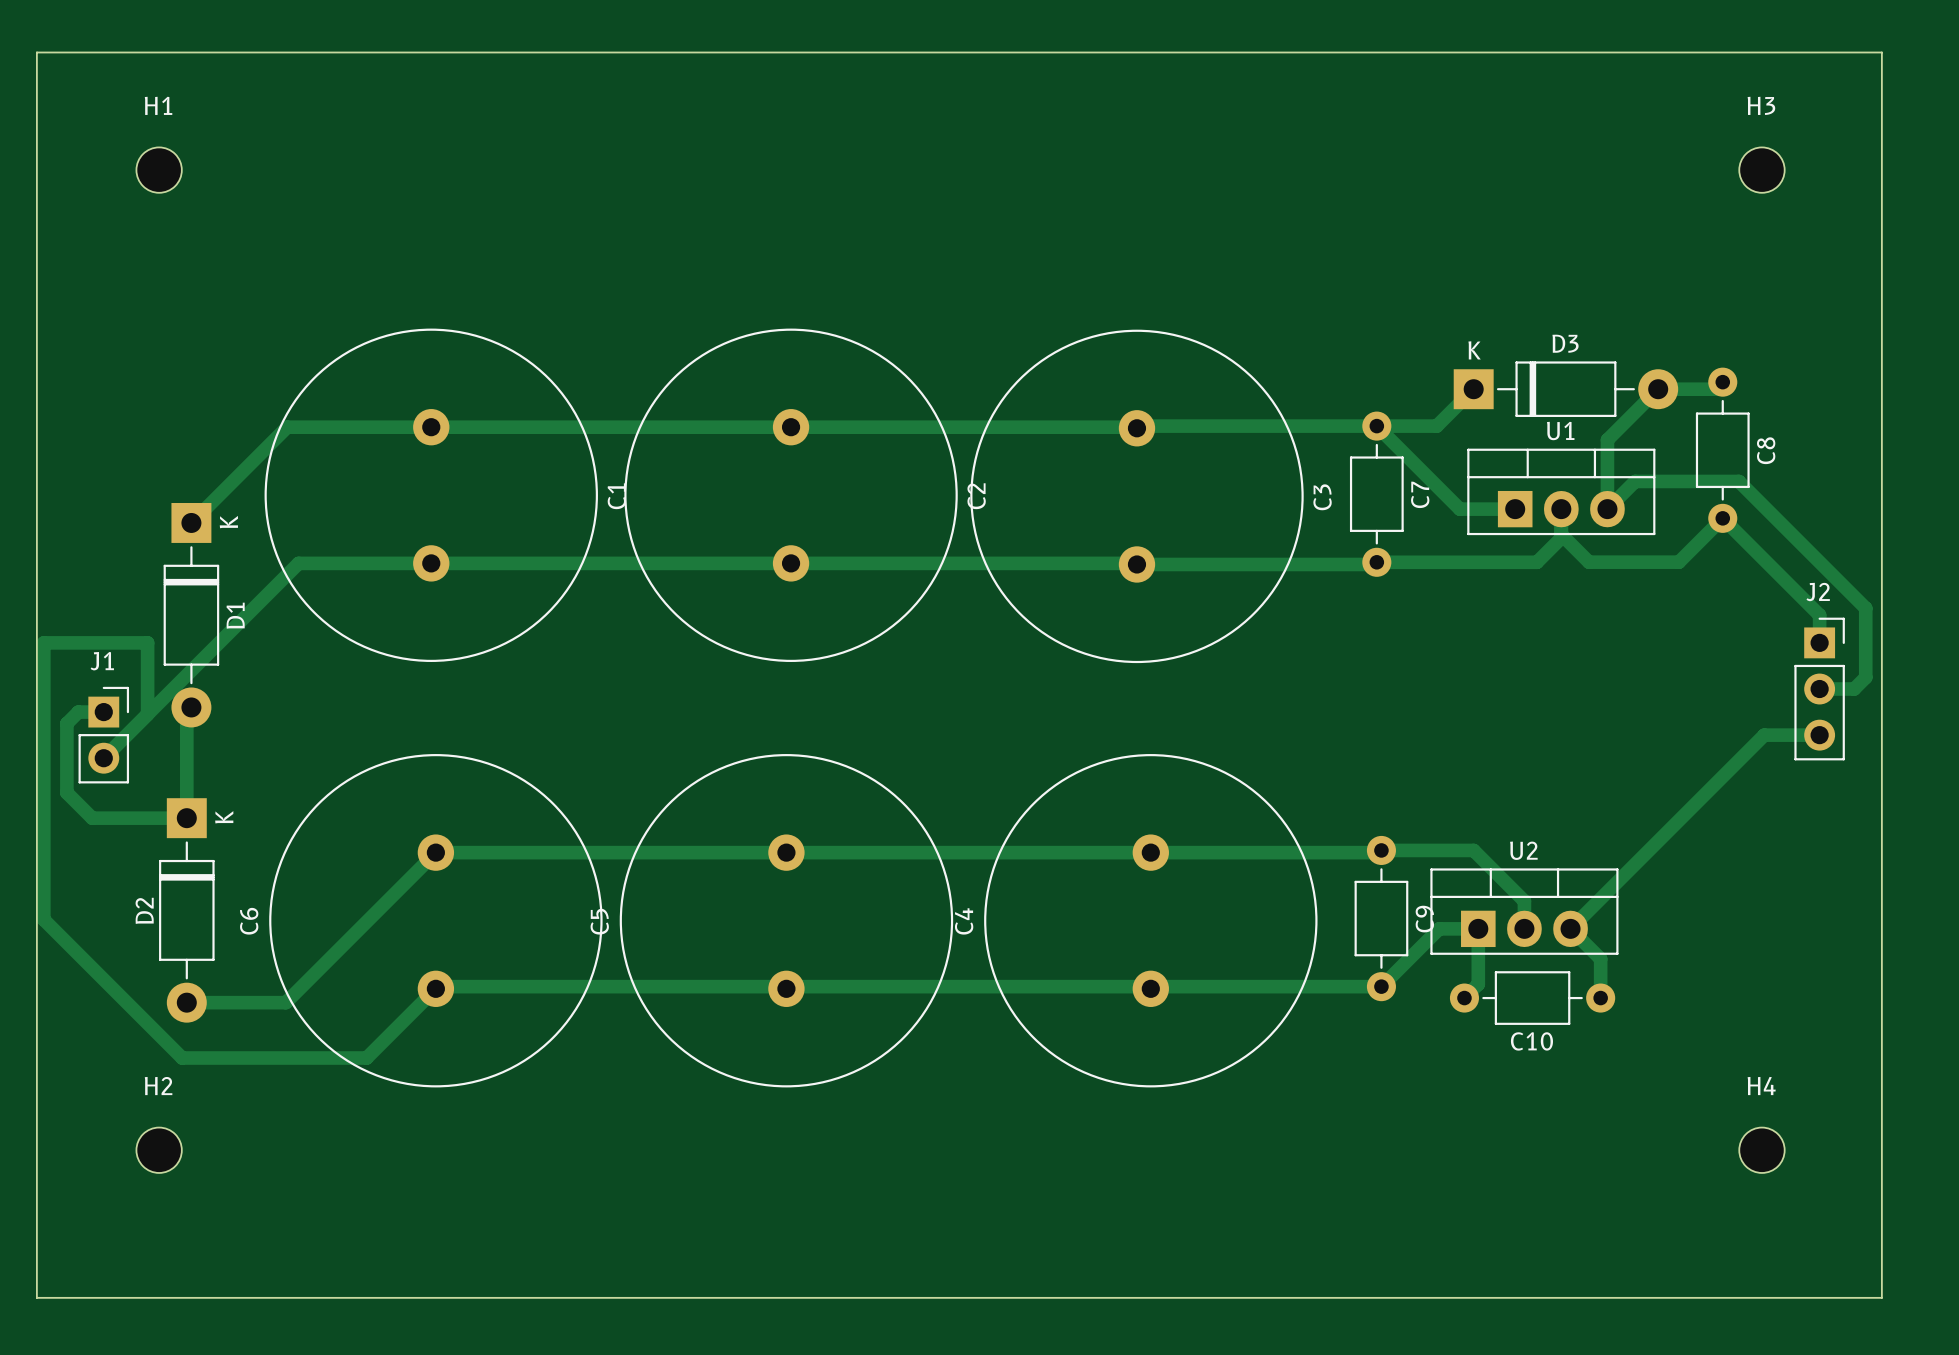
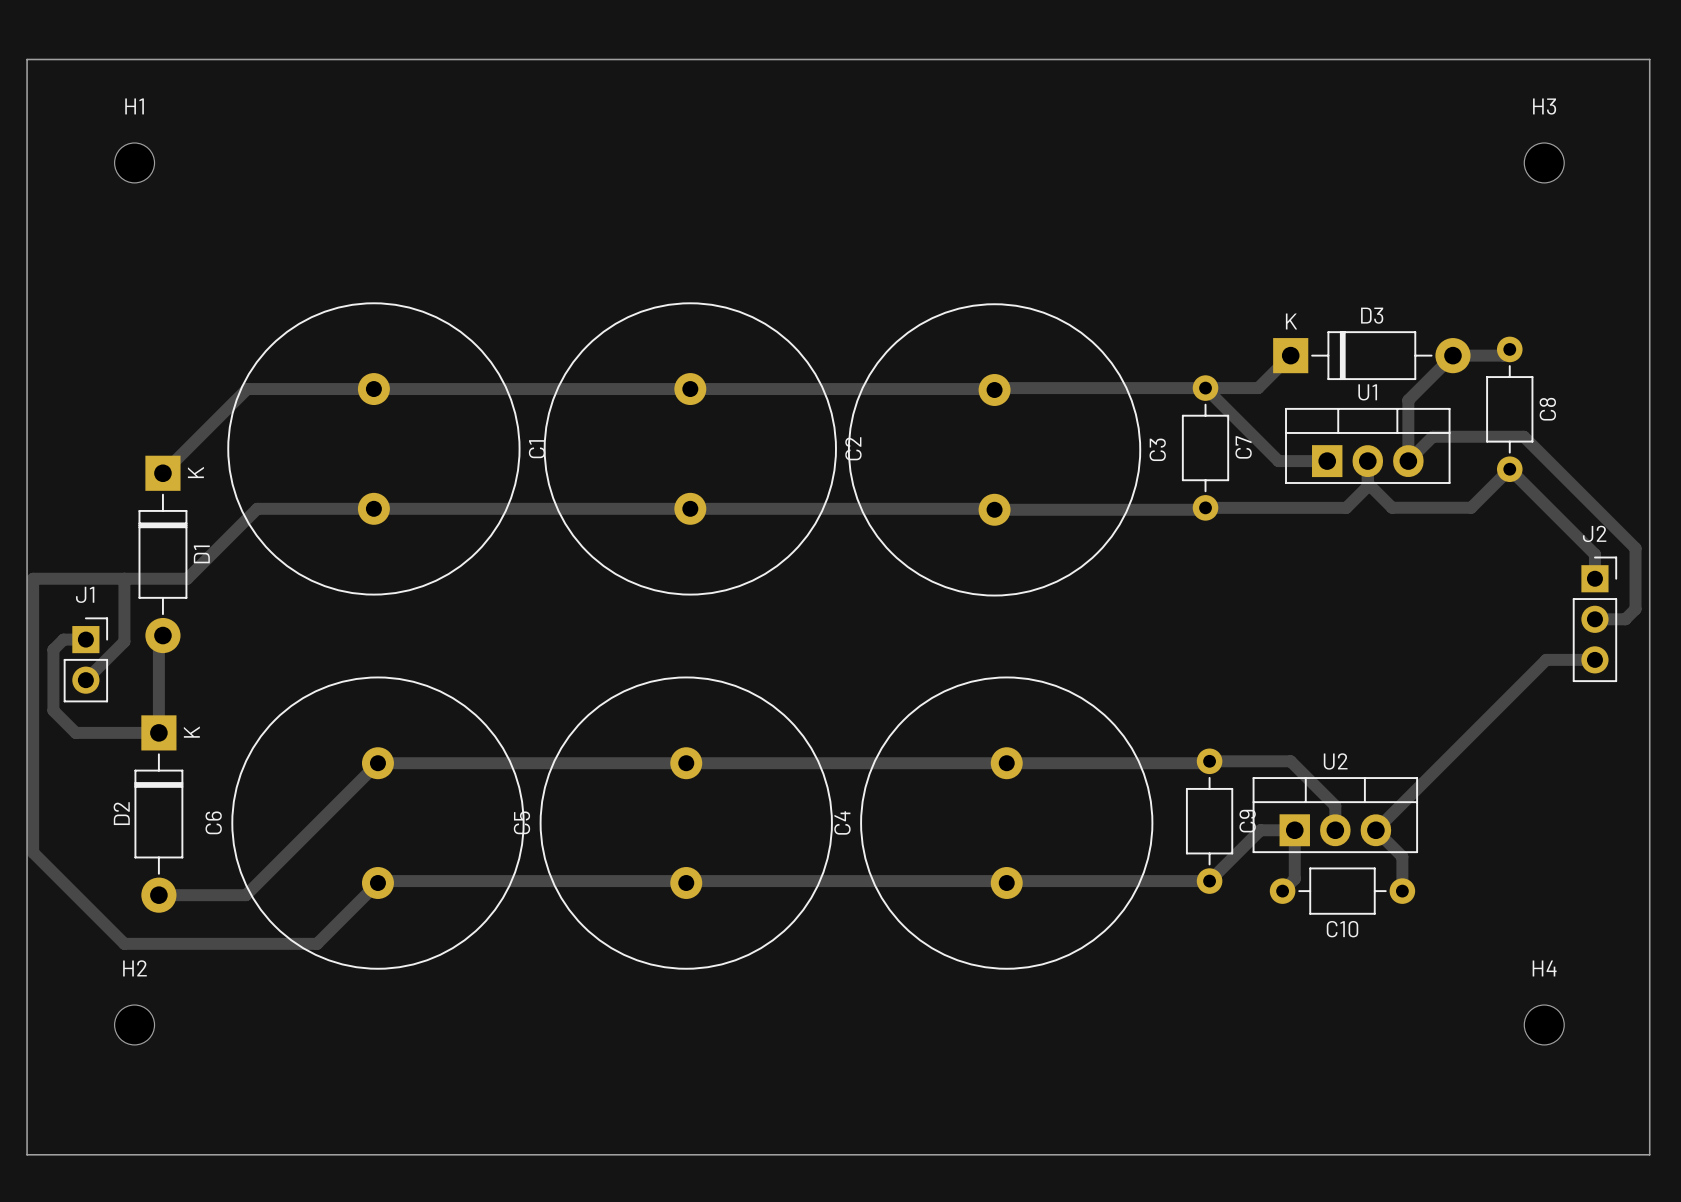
track: (219, 642) (147, 714) -> (187, 578) (124, 578)
track: (43, 919) (182, 1058) -> (33, 822) (33, 852) (124, 943) (154, 943)

